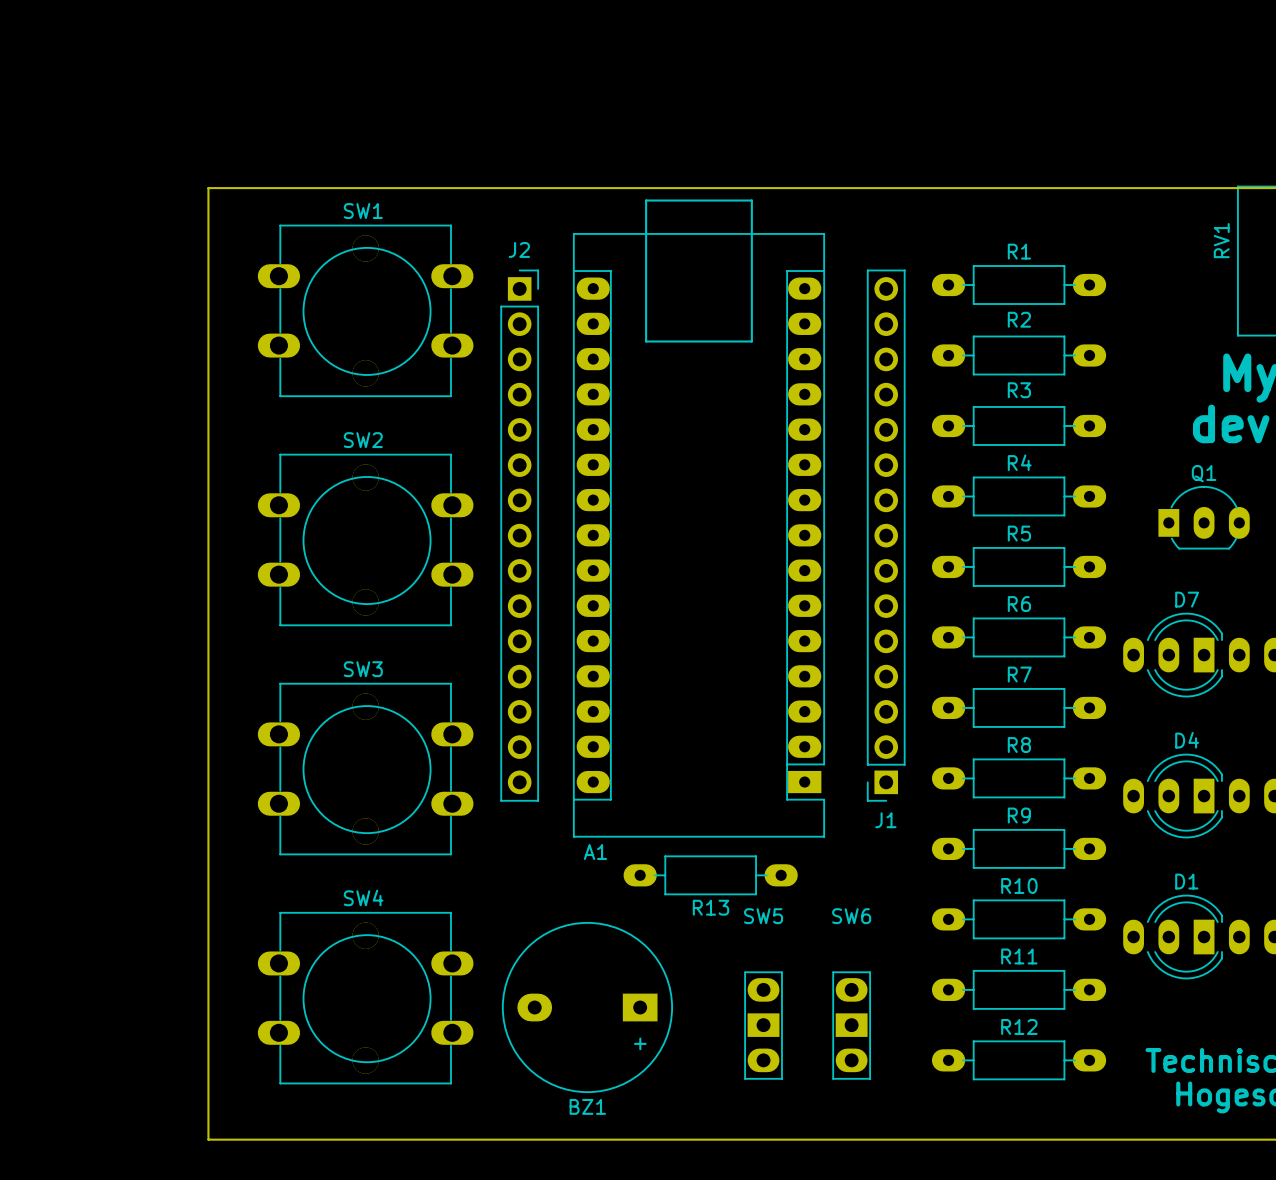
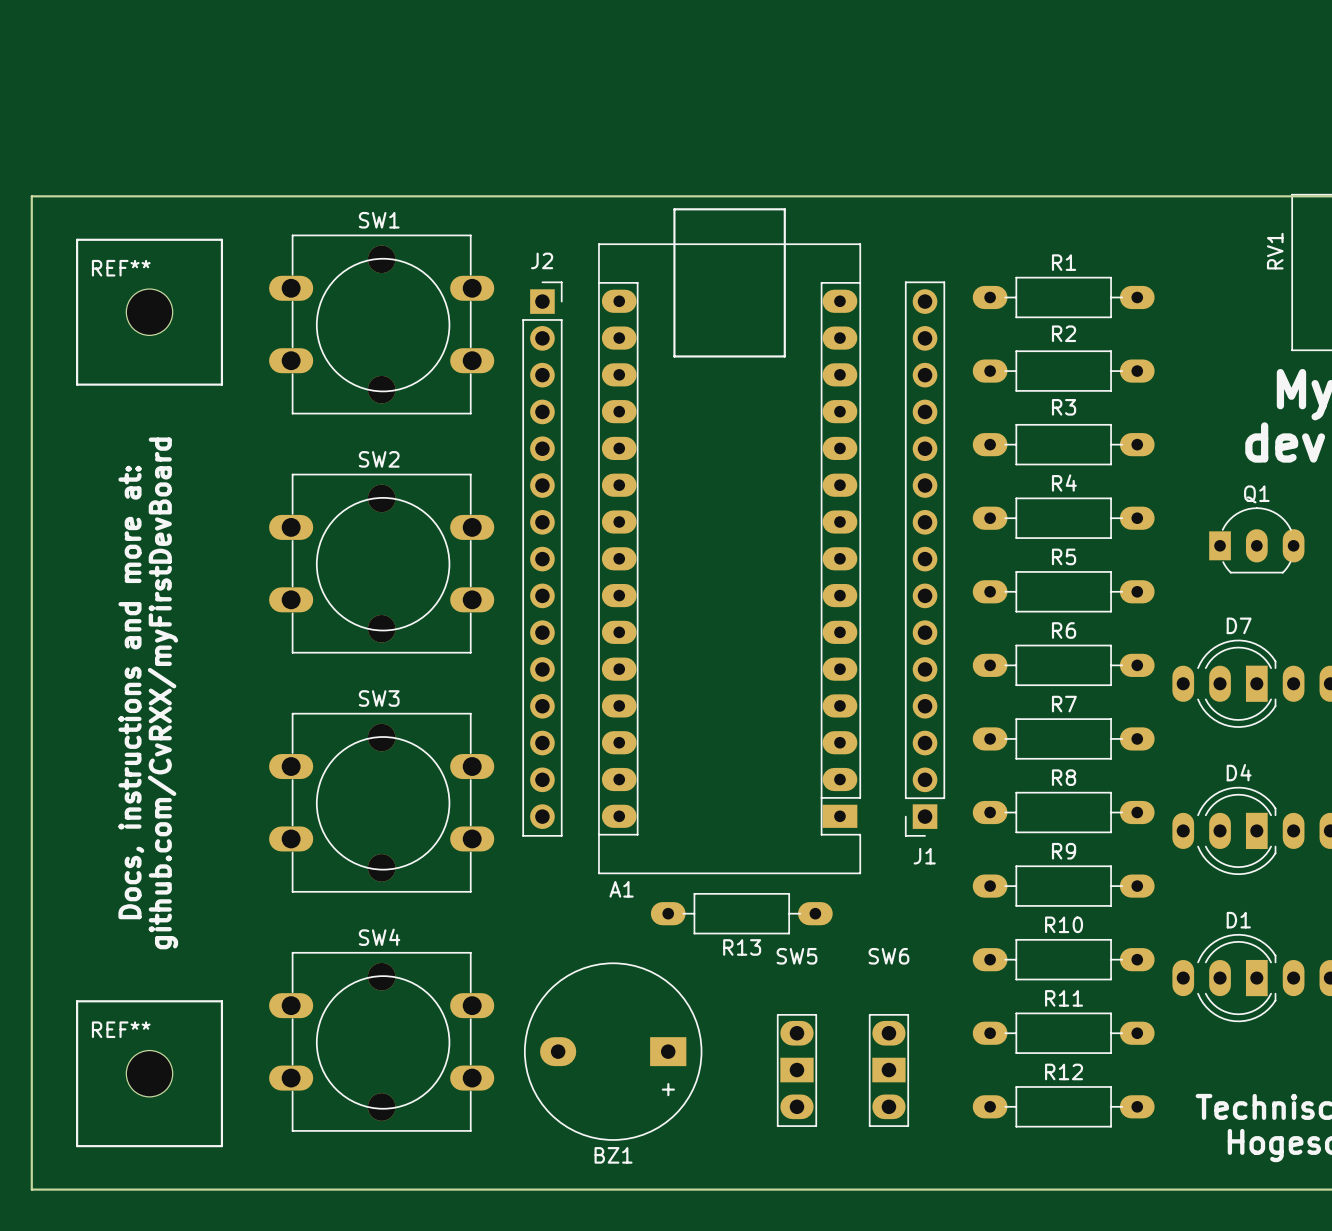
board edge: (208, 188) (208, 1139) -> (217, 196) (31, 196) (31, 1189) (217, 1189)
REF**: none -> (149, 312)
text: none -> Docs, instructions and more at: (131, 692)
text: none -> github.com/CvRXX/myFirstDevBoard (162, 693)
REF**: none -> (149, 1073)

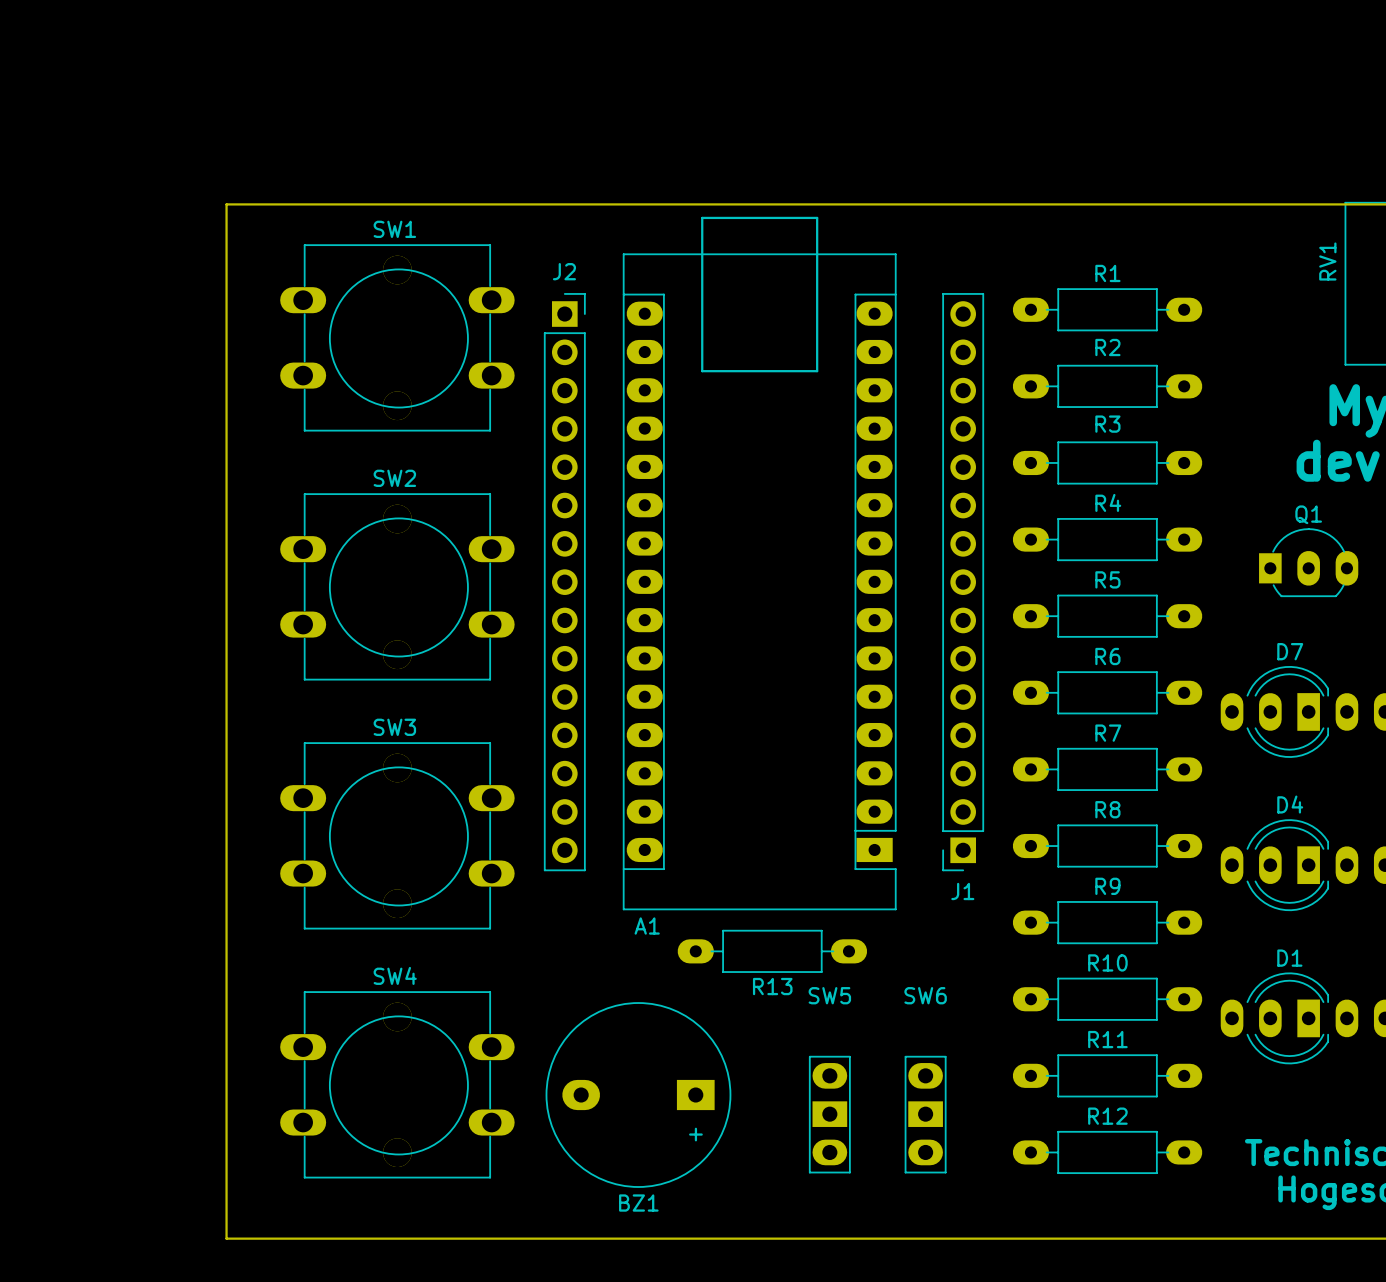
board edge: (217, 196) (31, 196) (31, 1189) (217, 1189) -> (226, 204) (226, 1238)
REF**: (149, 312) -> none
text: Docs, instructions and more at: (131, 692) -> none
text: github.com/CvRXX/myFirstDevBoard (162, 693) -> none
REF**: (149, 1073) -> none

